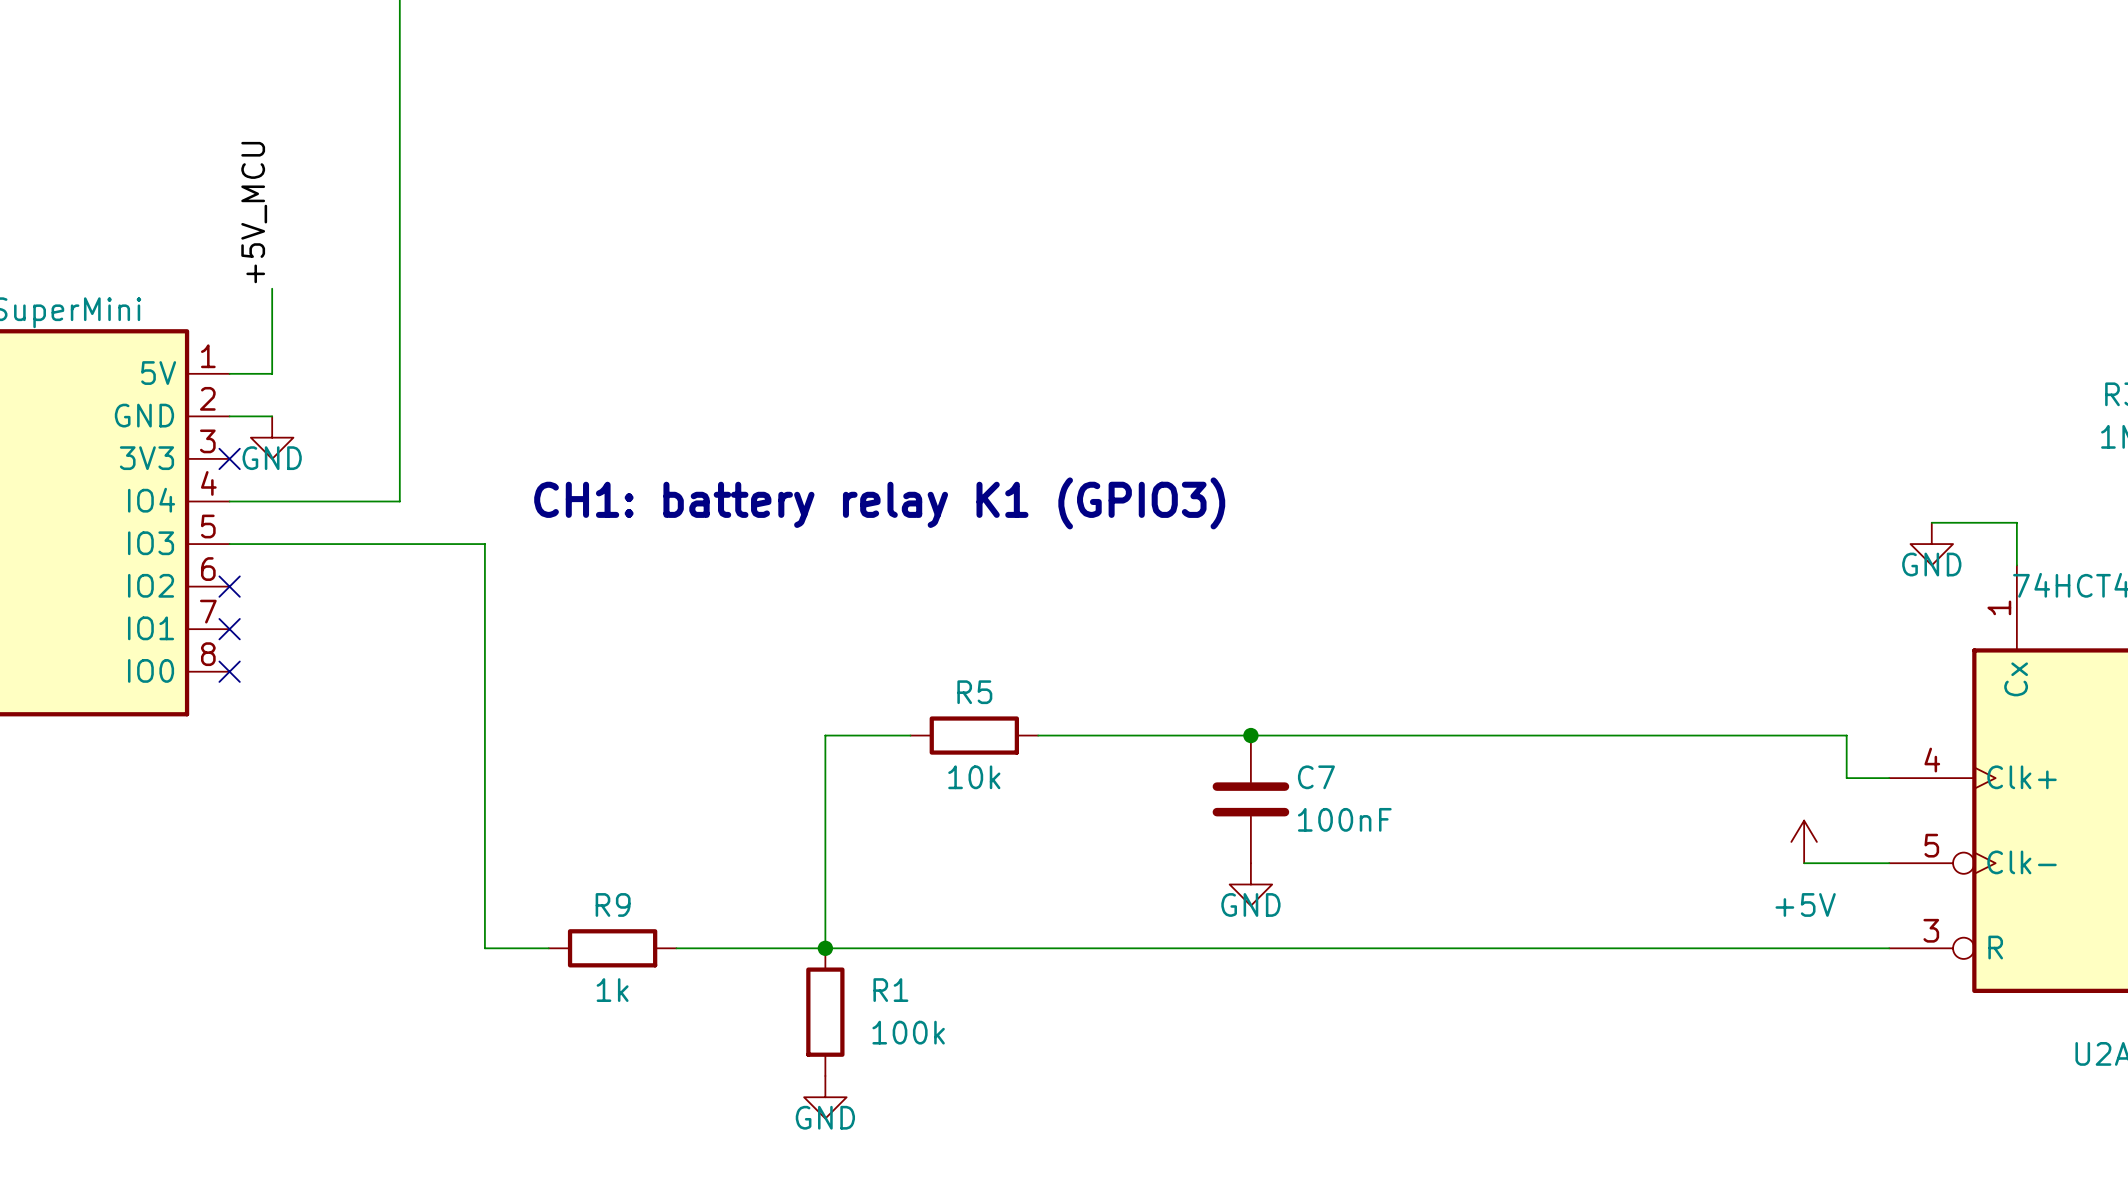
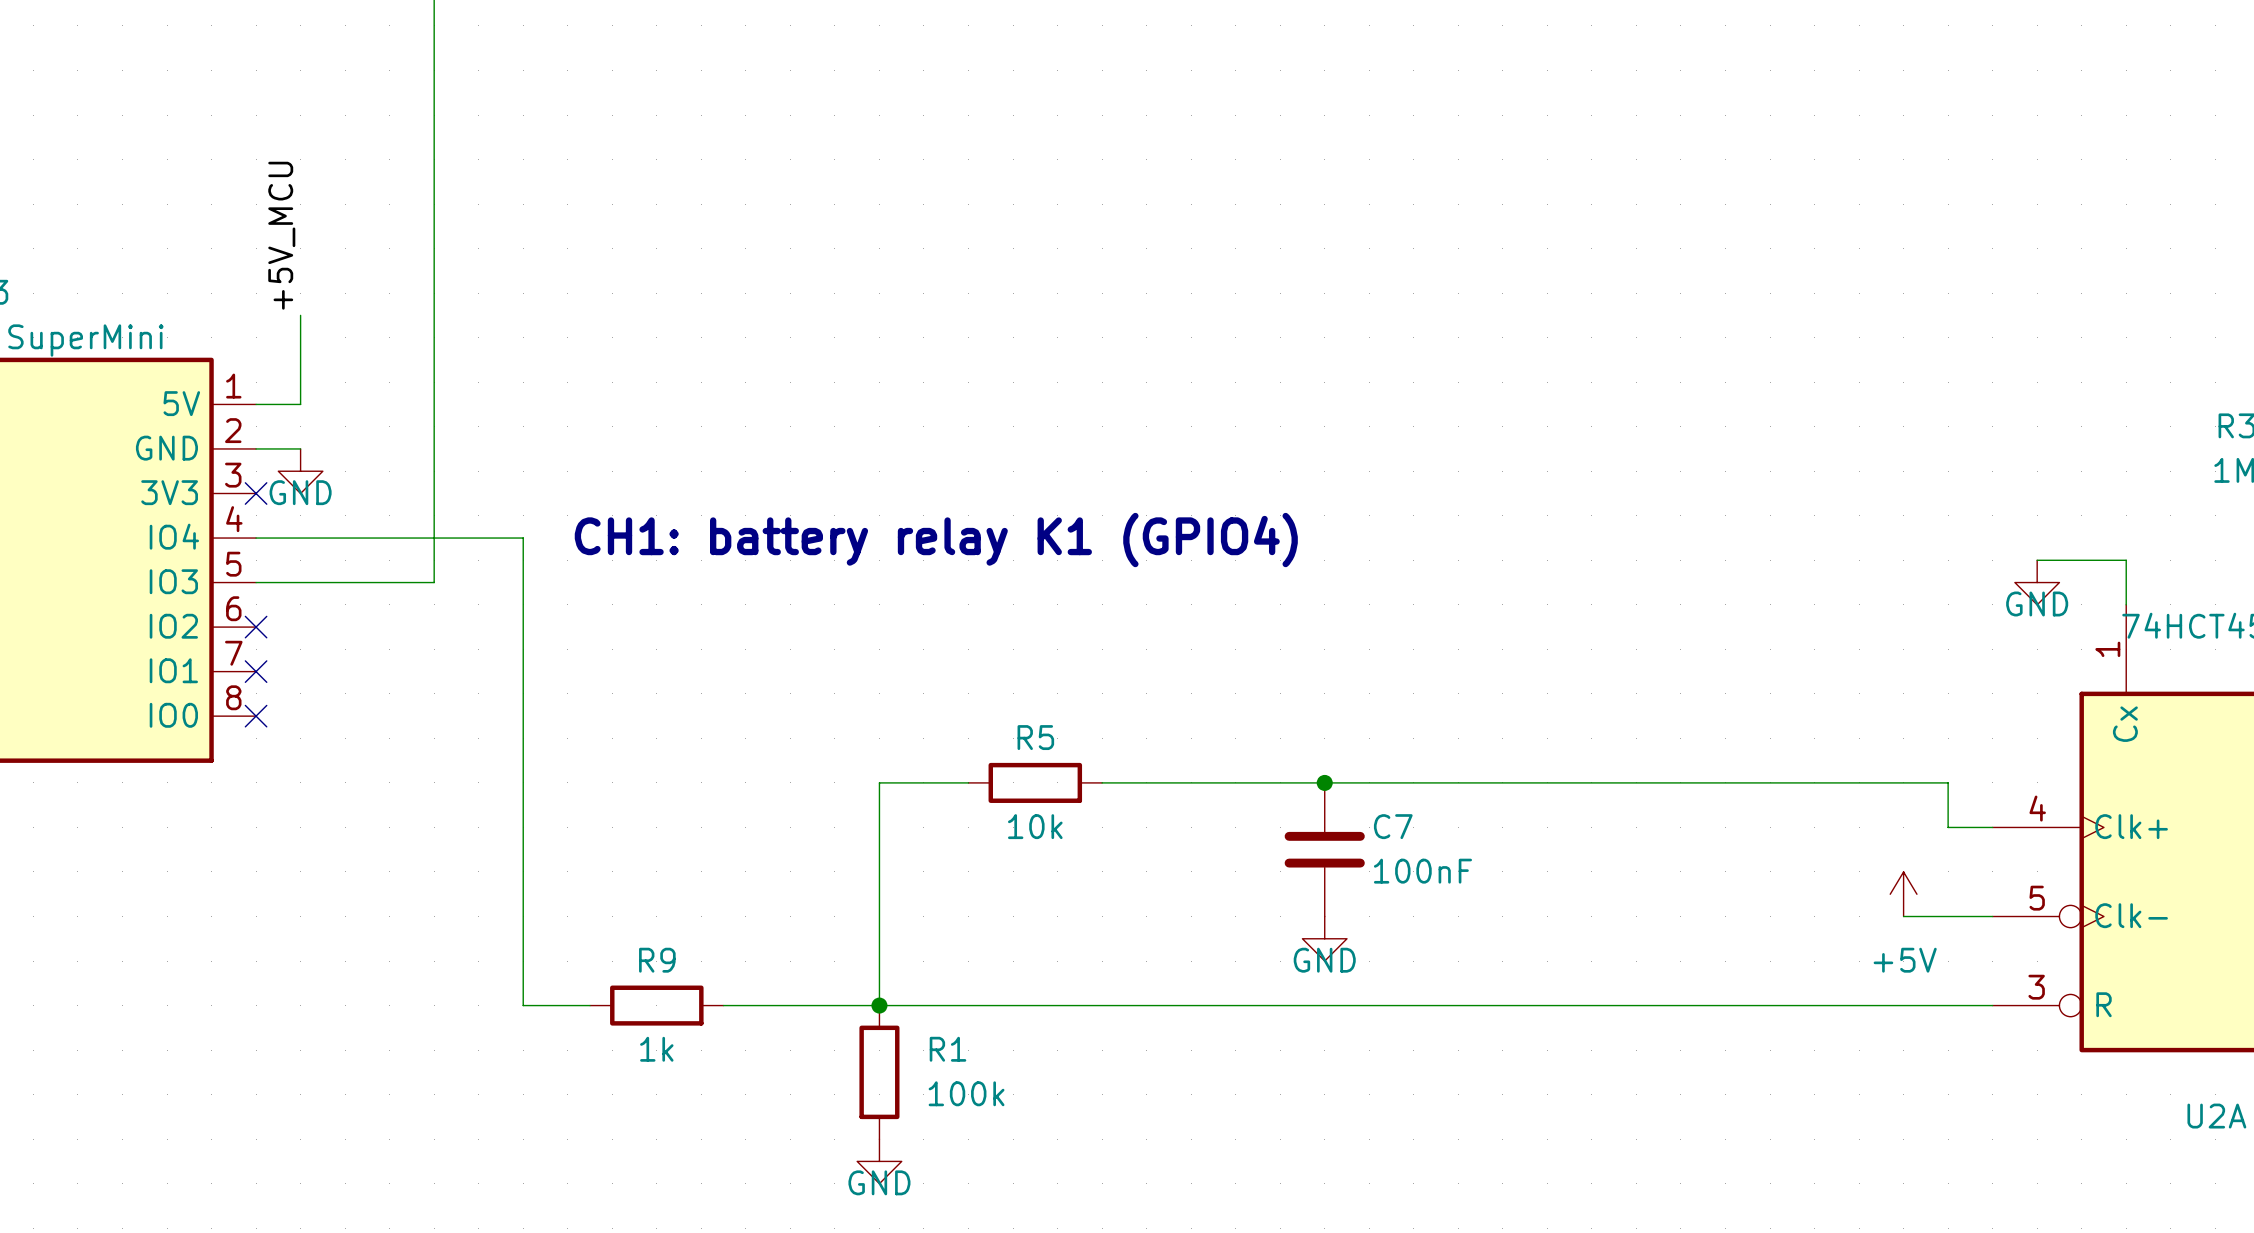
text: CH1: battery relay K1 (GPIO3) (879, 503) -> CH1: battery relay K1 (GPIO4) (936, 540)
wire: (399, 544) (484, 544) -> (434, 582) (434, 538) (523, 538) (523, 582)

